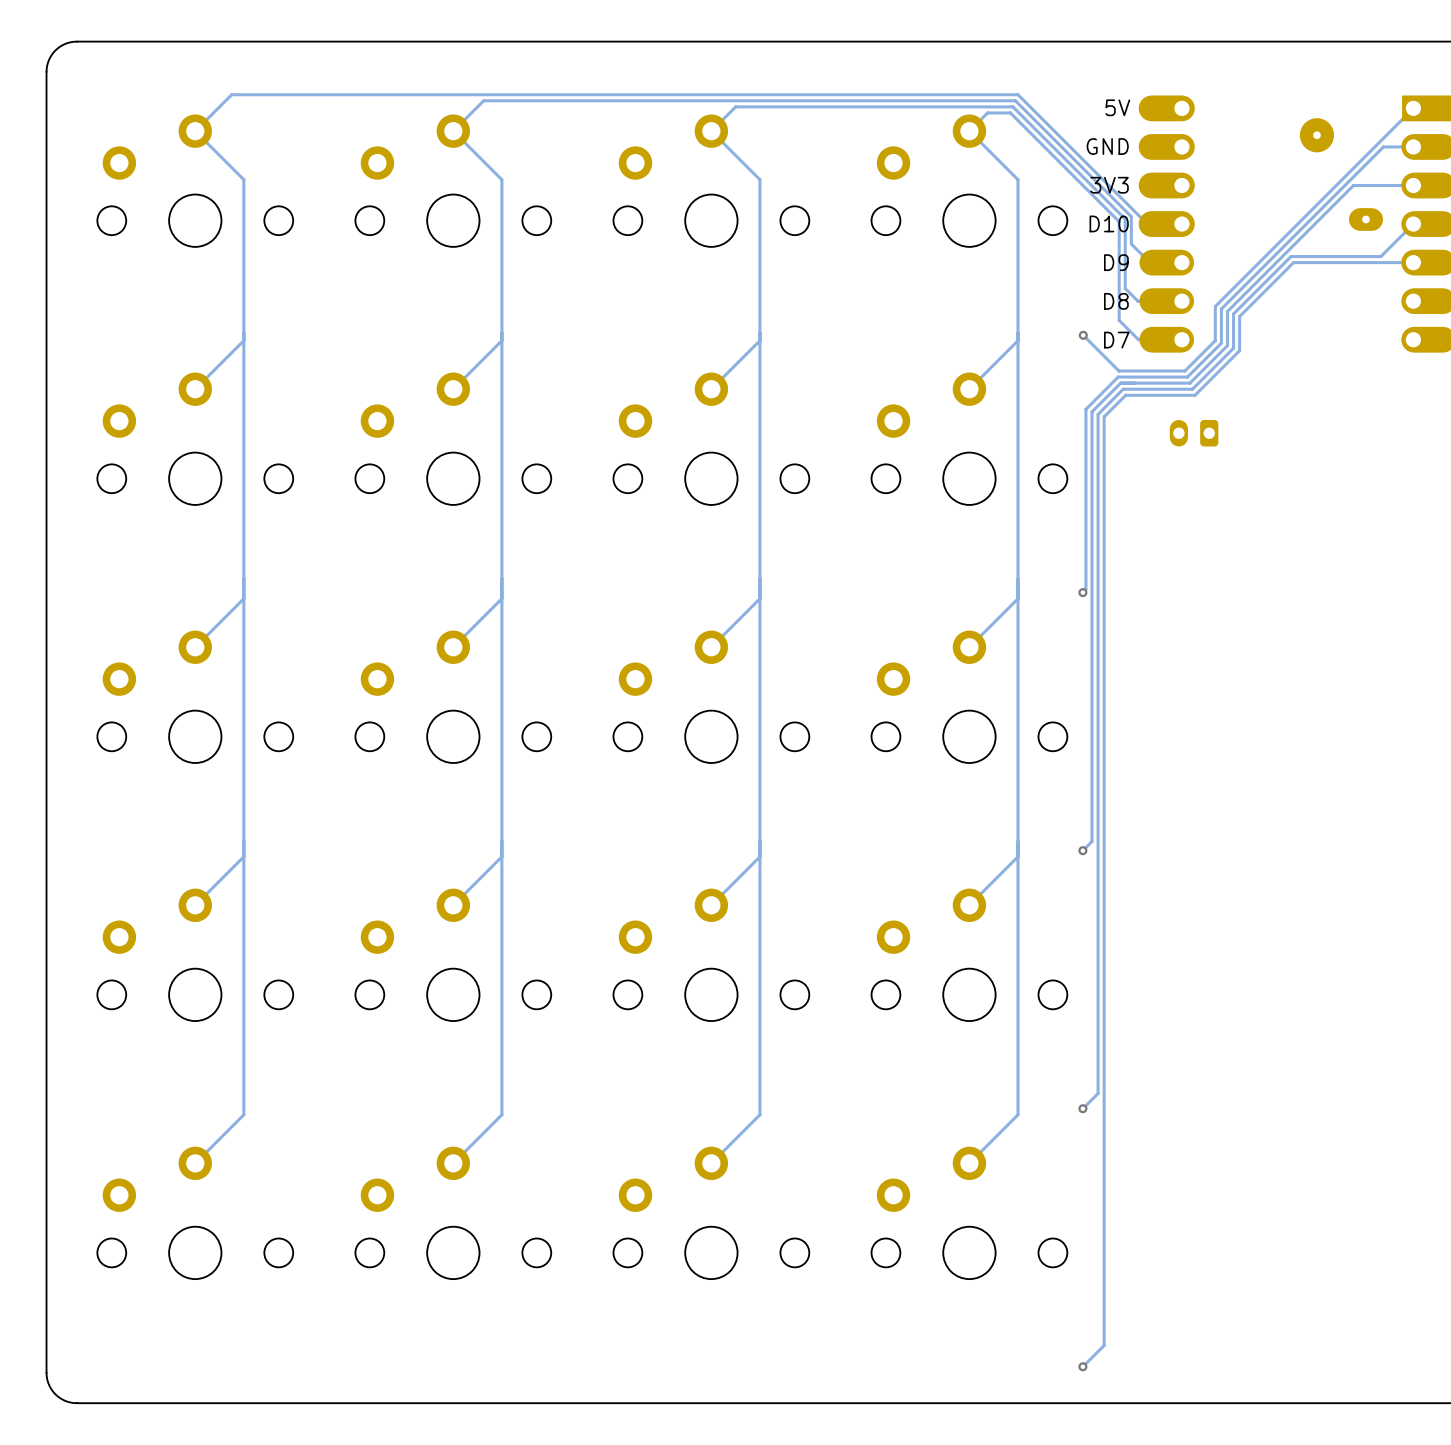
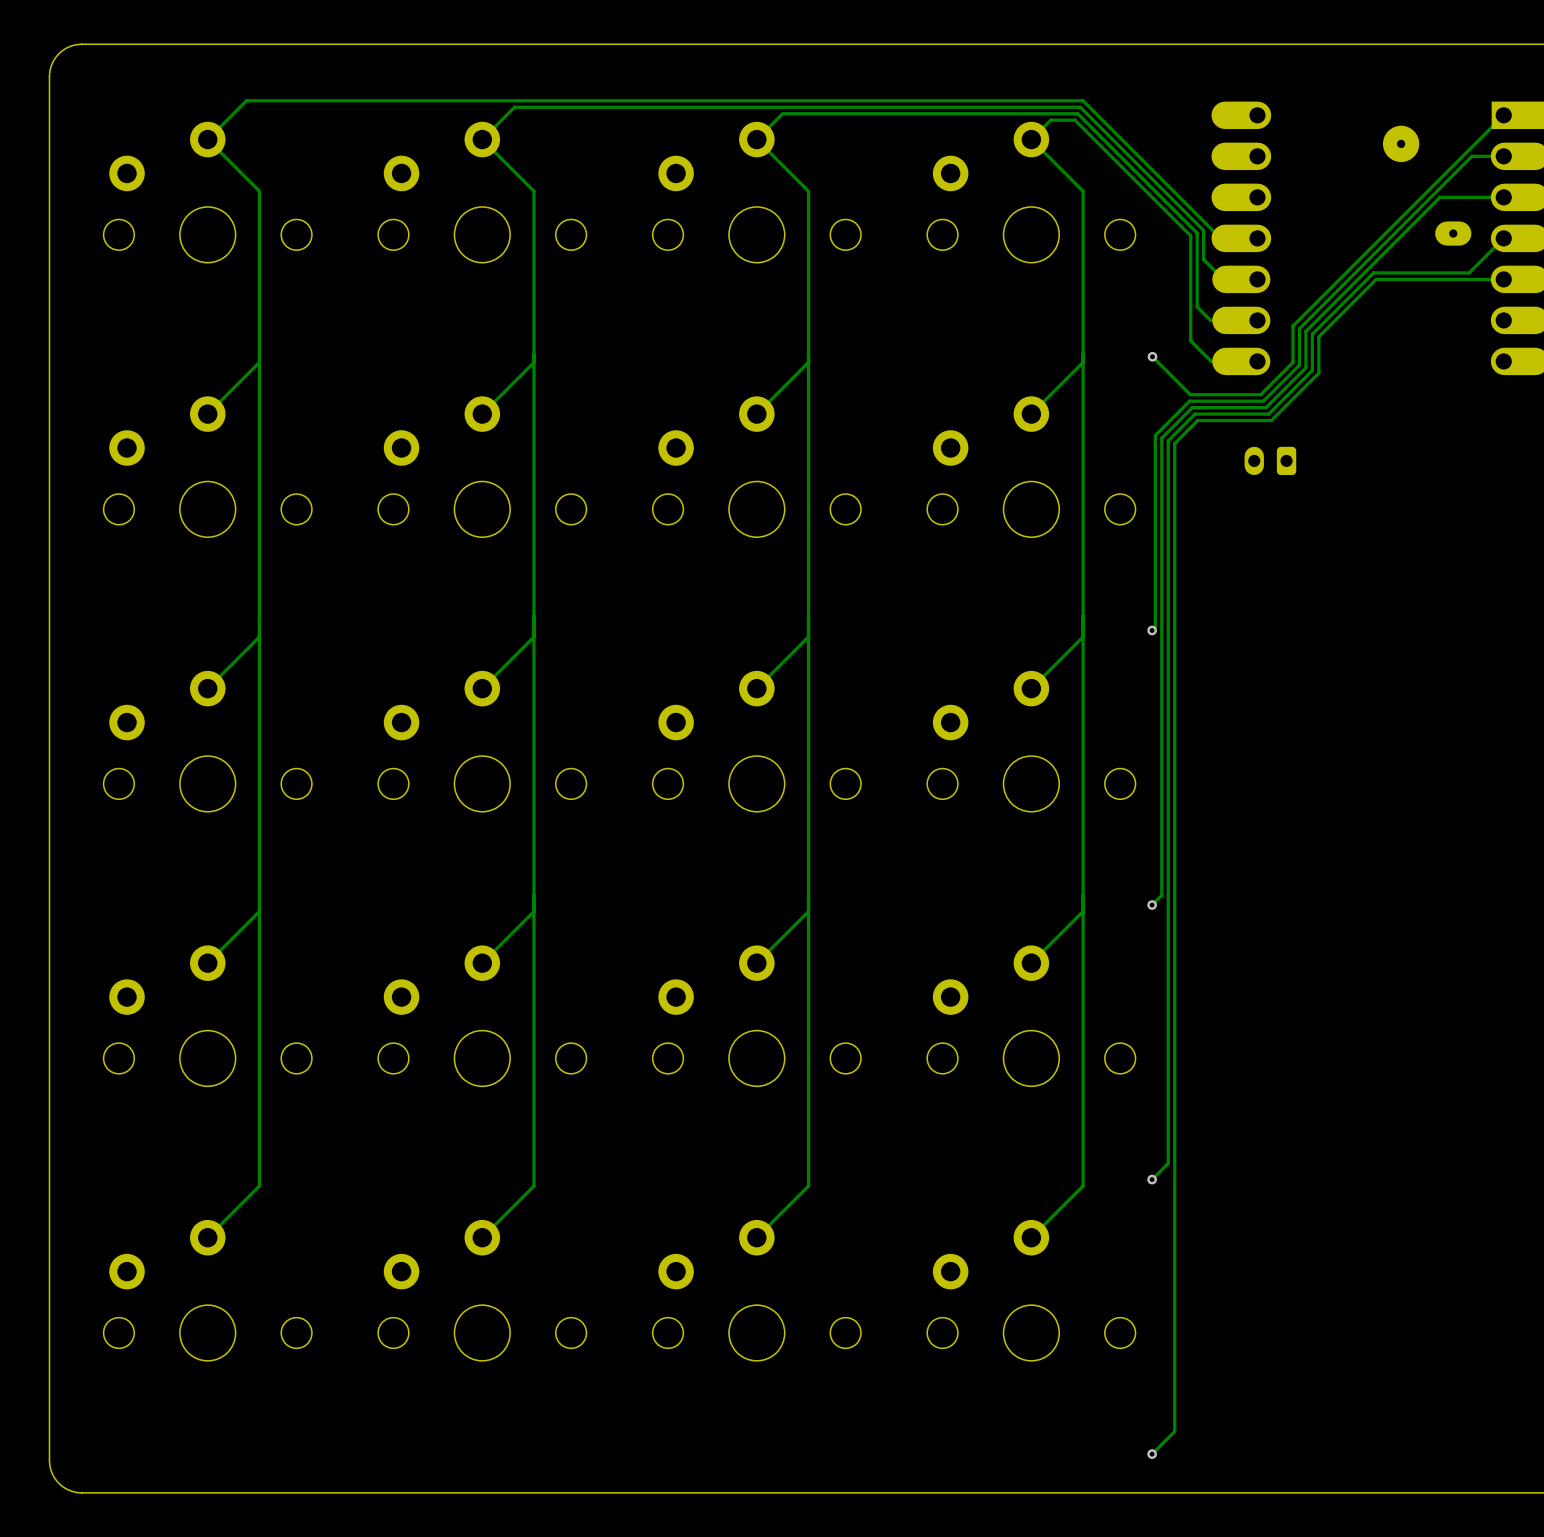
text: 5V (1117, 107) -> none
text: GND (1107, 146) -> none
text: 3V3 (1109, 185) -> none
text: D10 (1109, 223) -> none
text: D9 (1116, 262) -> none
text: D8 (1116, 301) -> none
text: D7 (1116, 340) -> none

